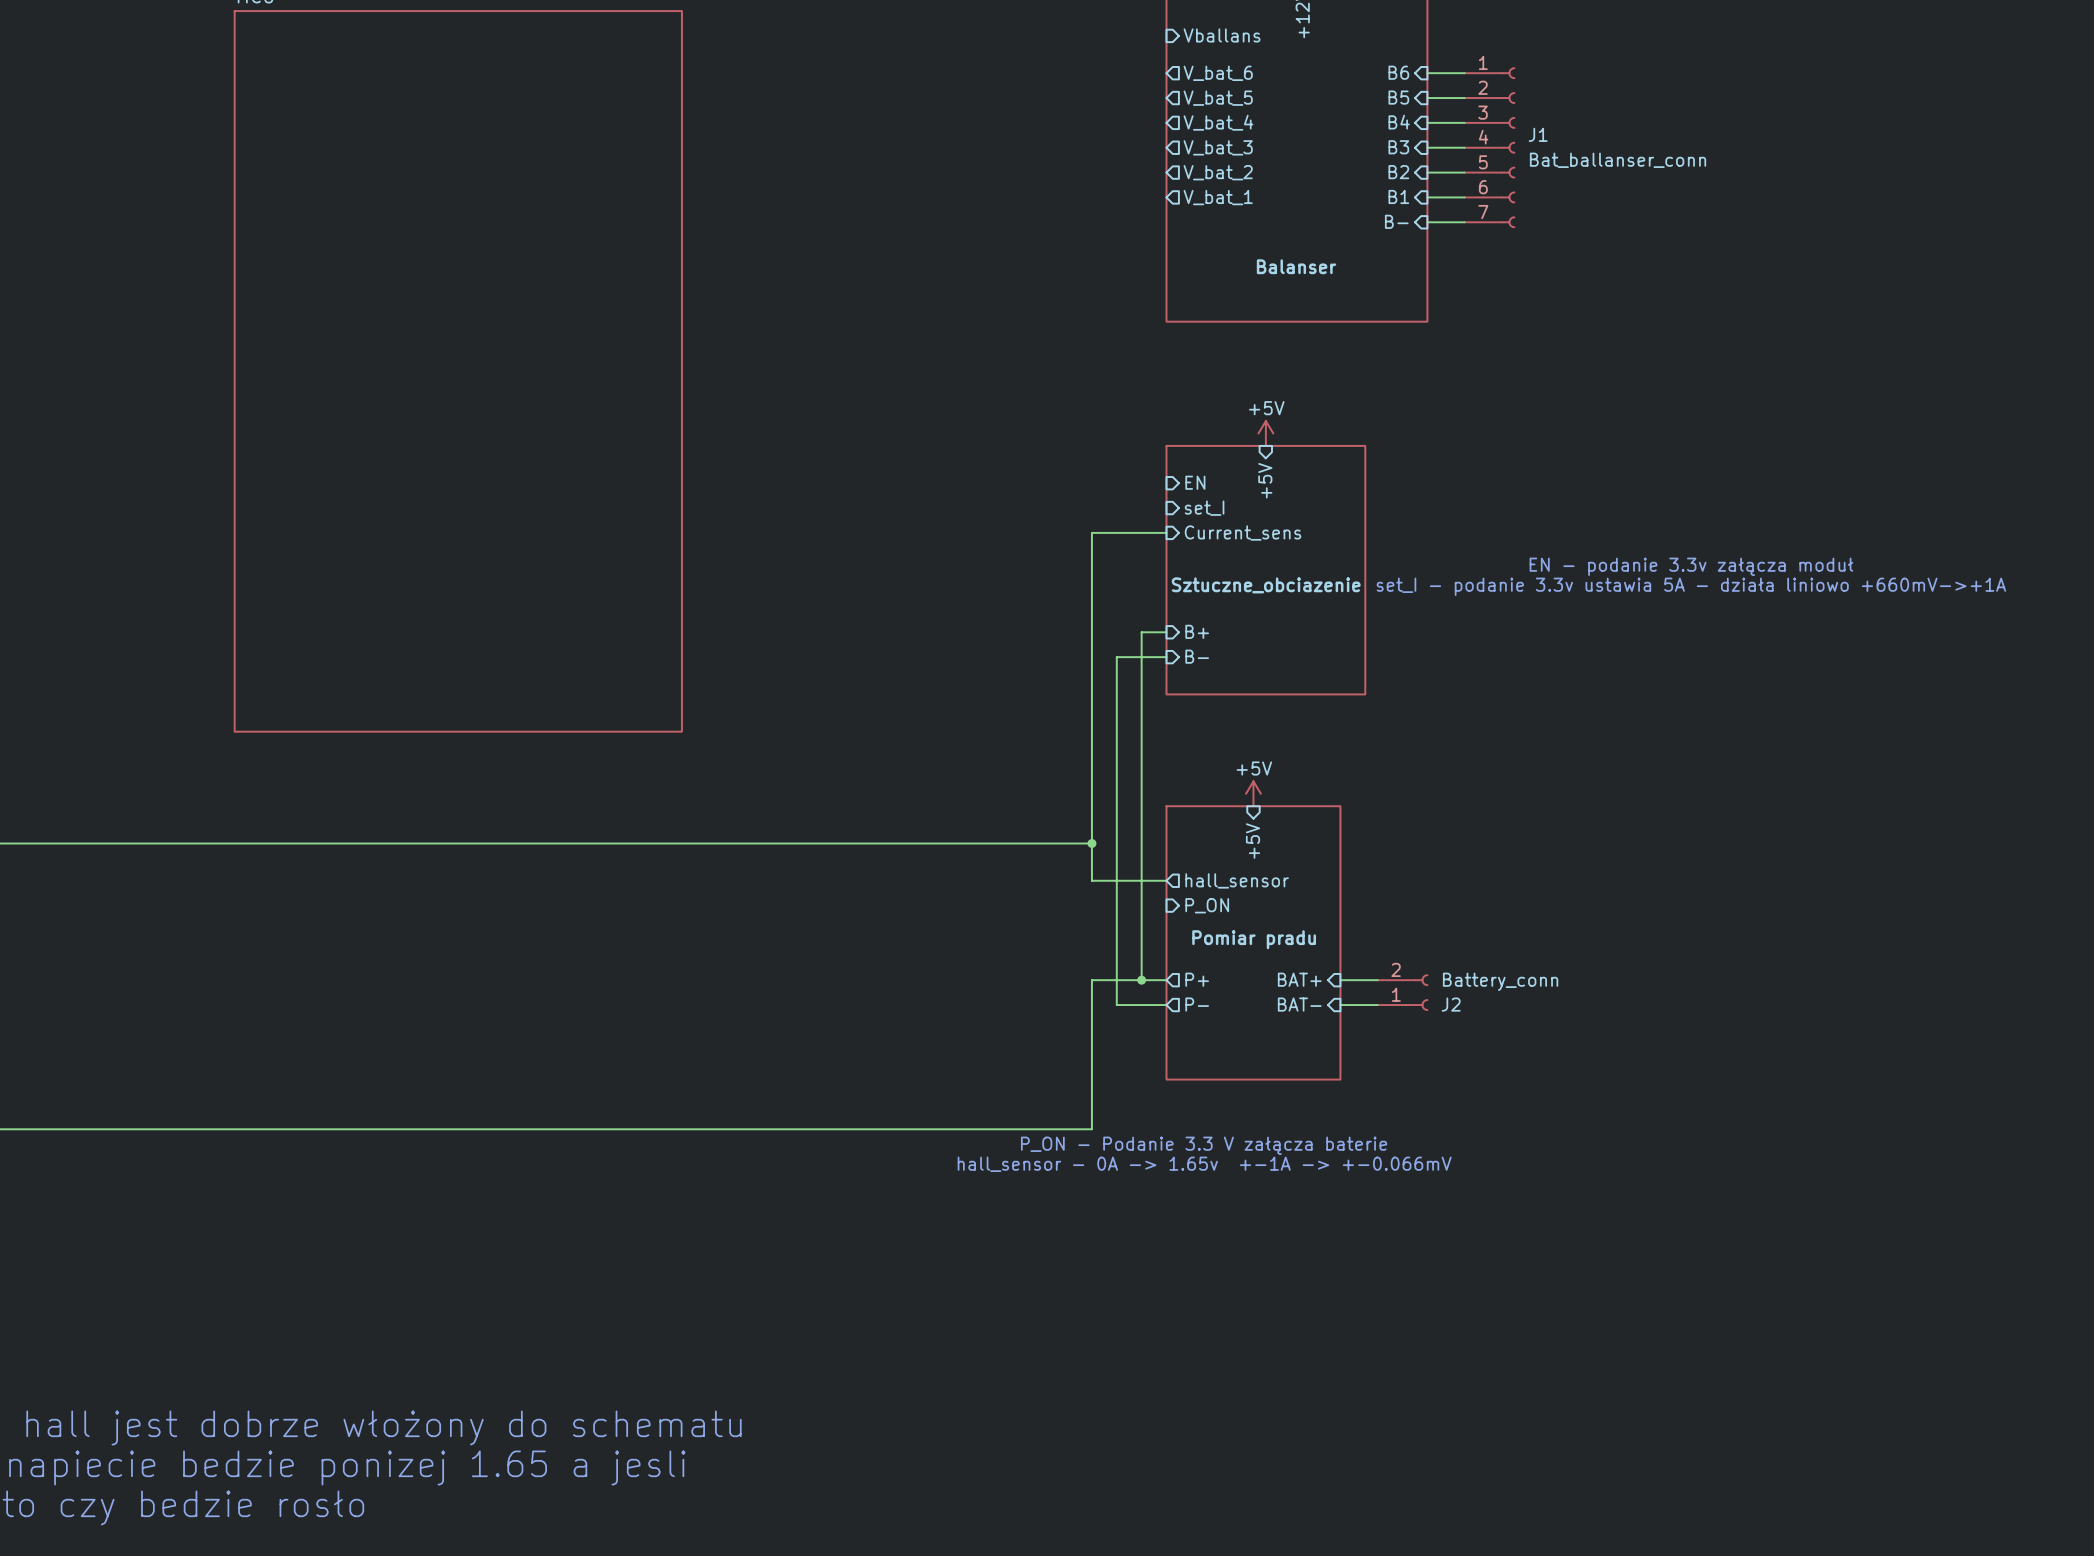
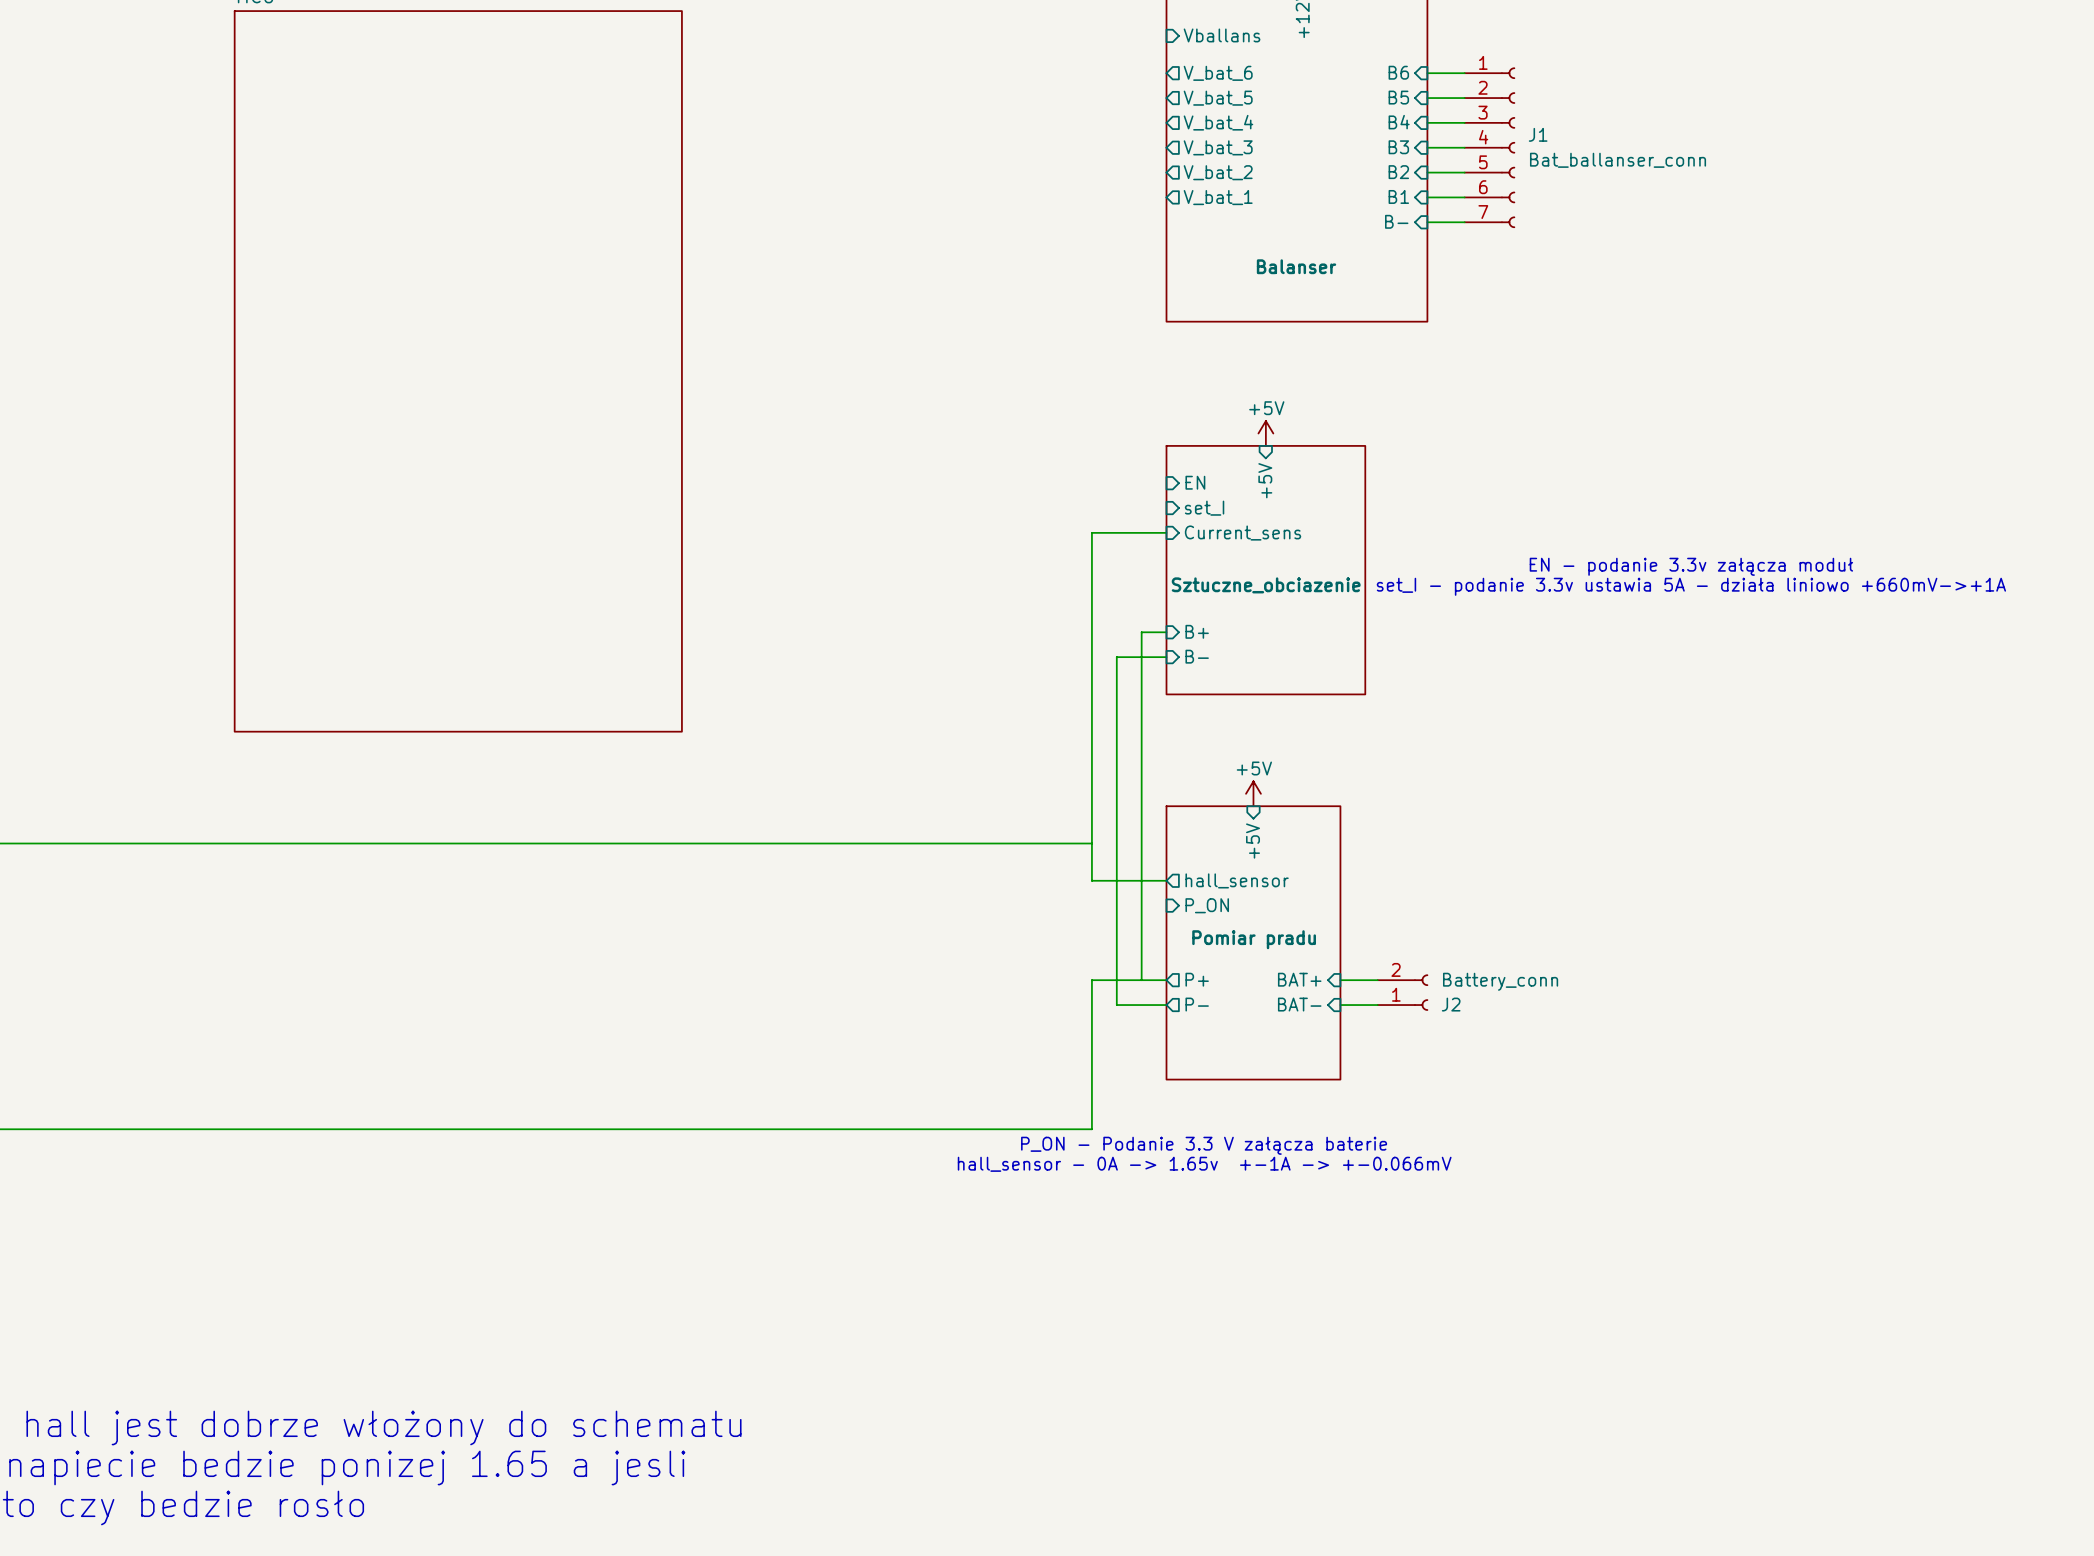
junction: (1091, 843) -> none
junction: (1141, 980) -> none

